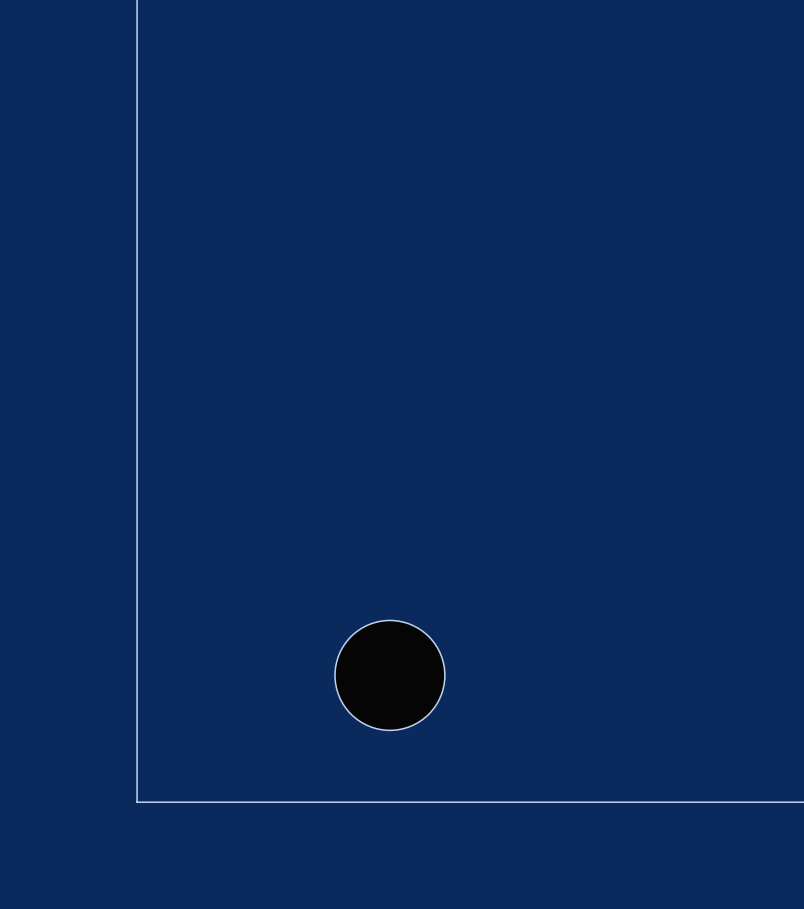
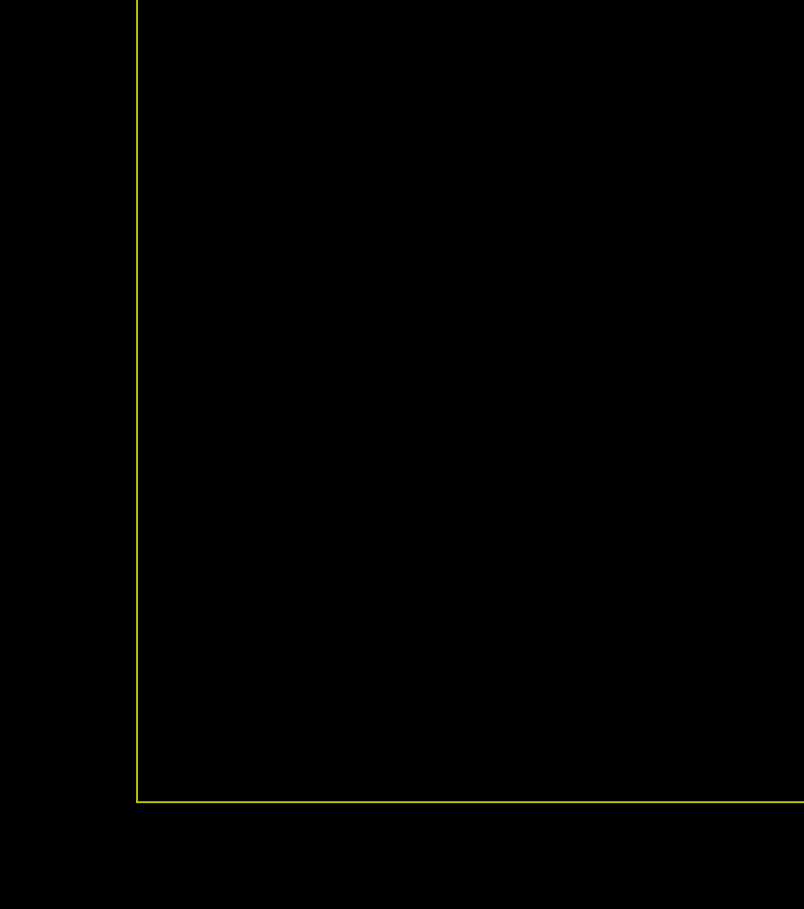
part: (389, 675) -> none

